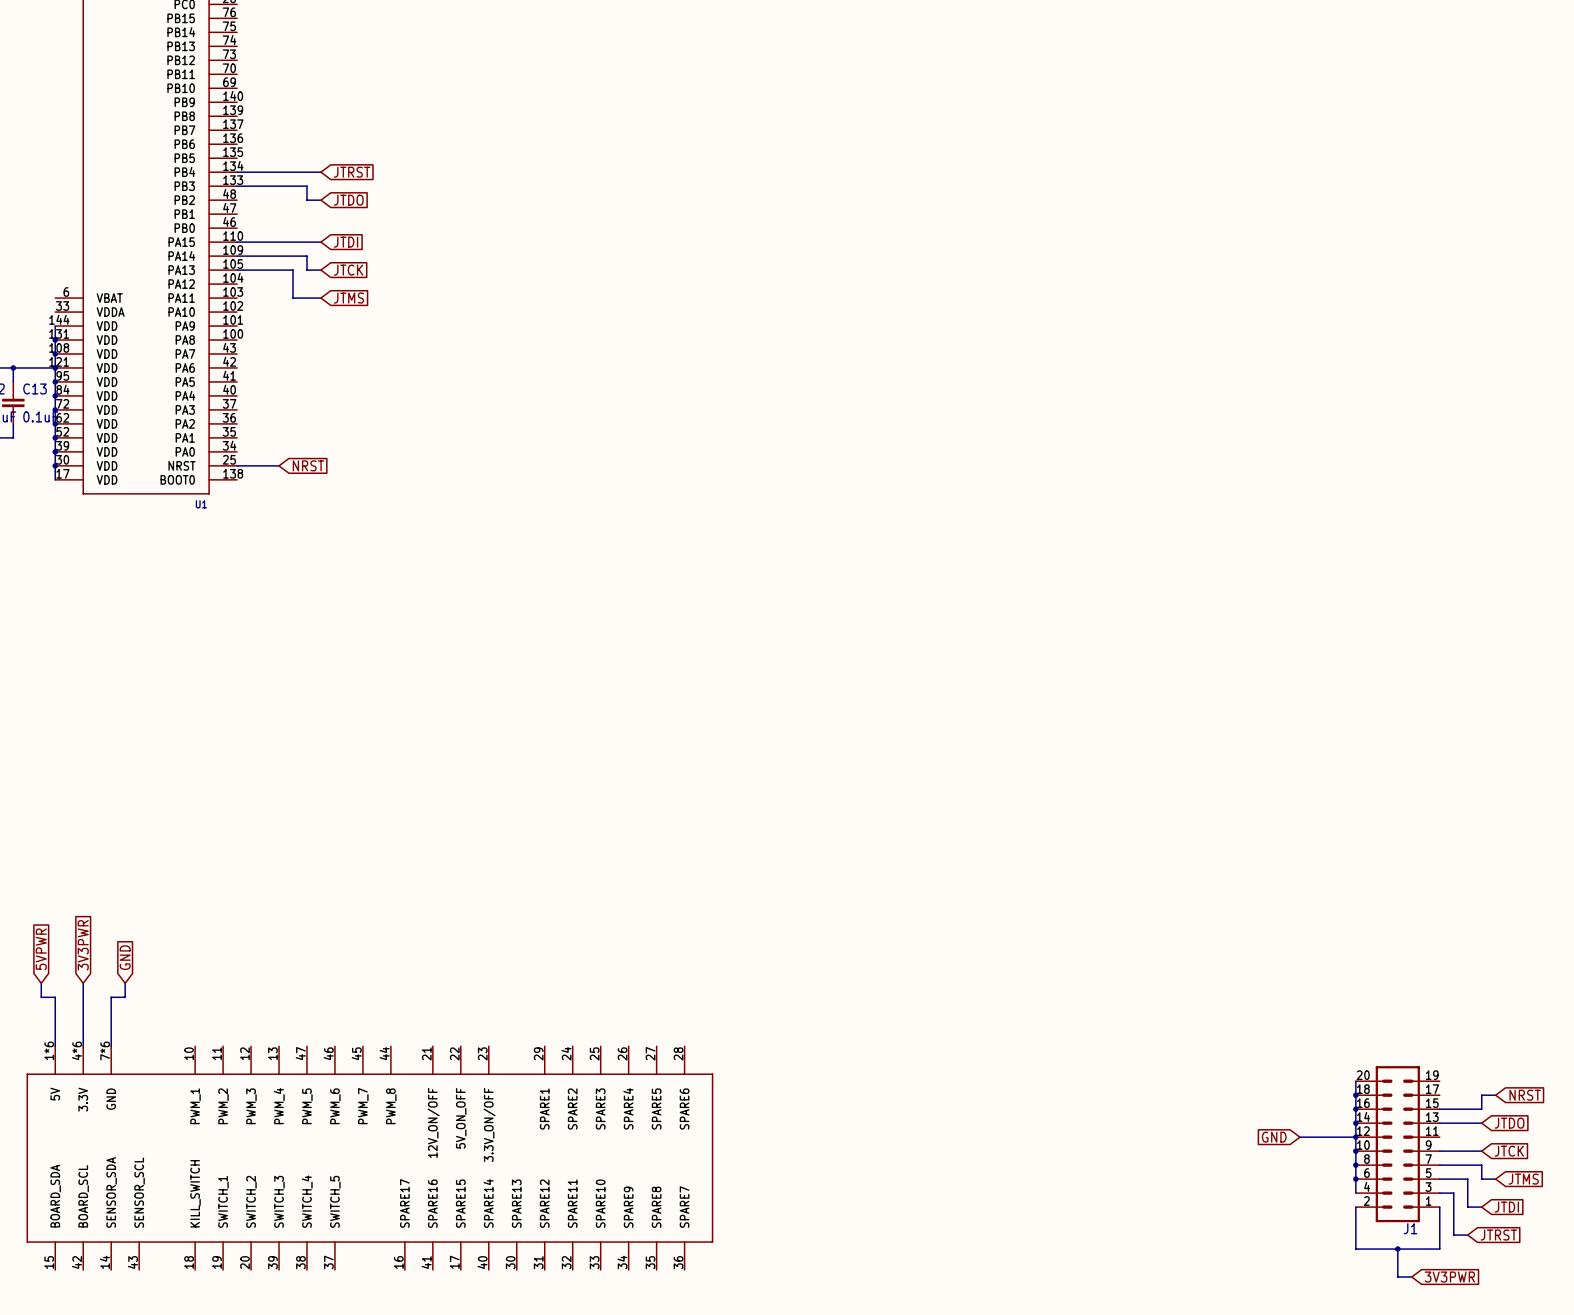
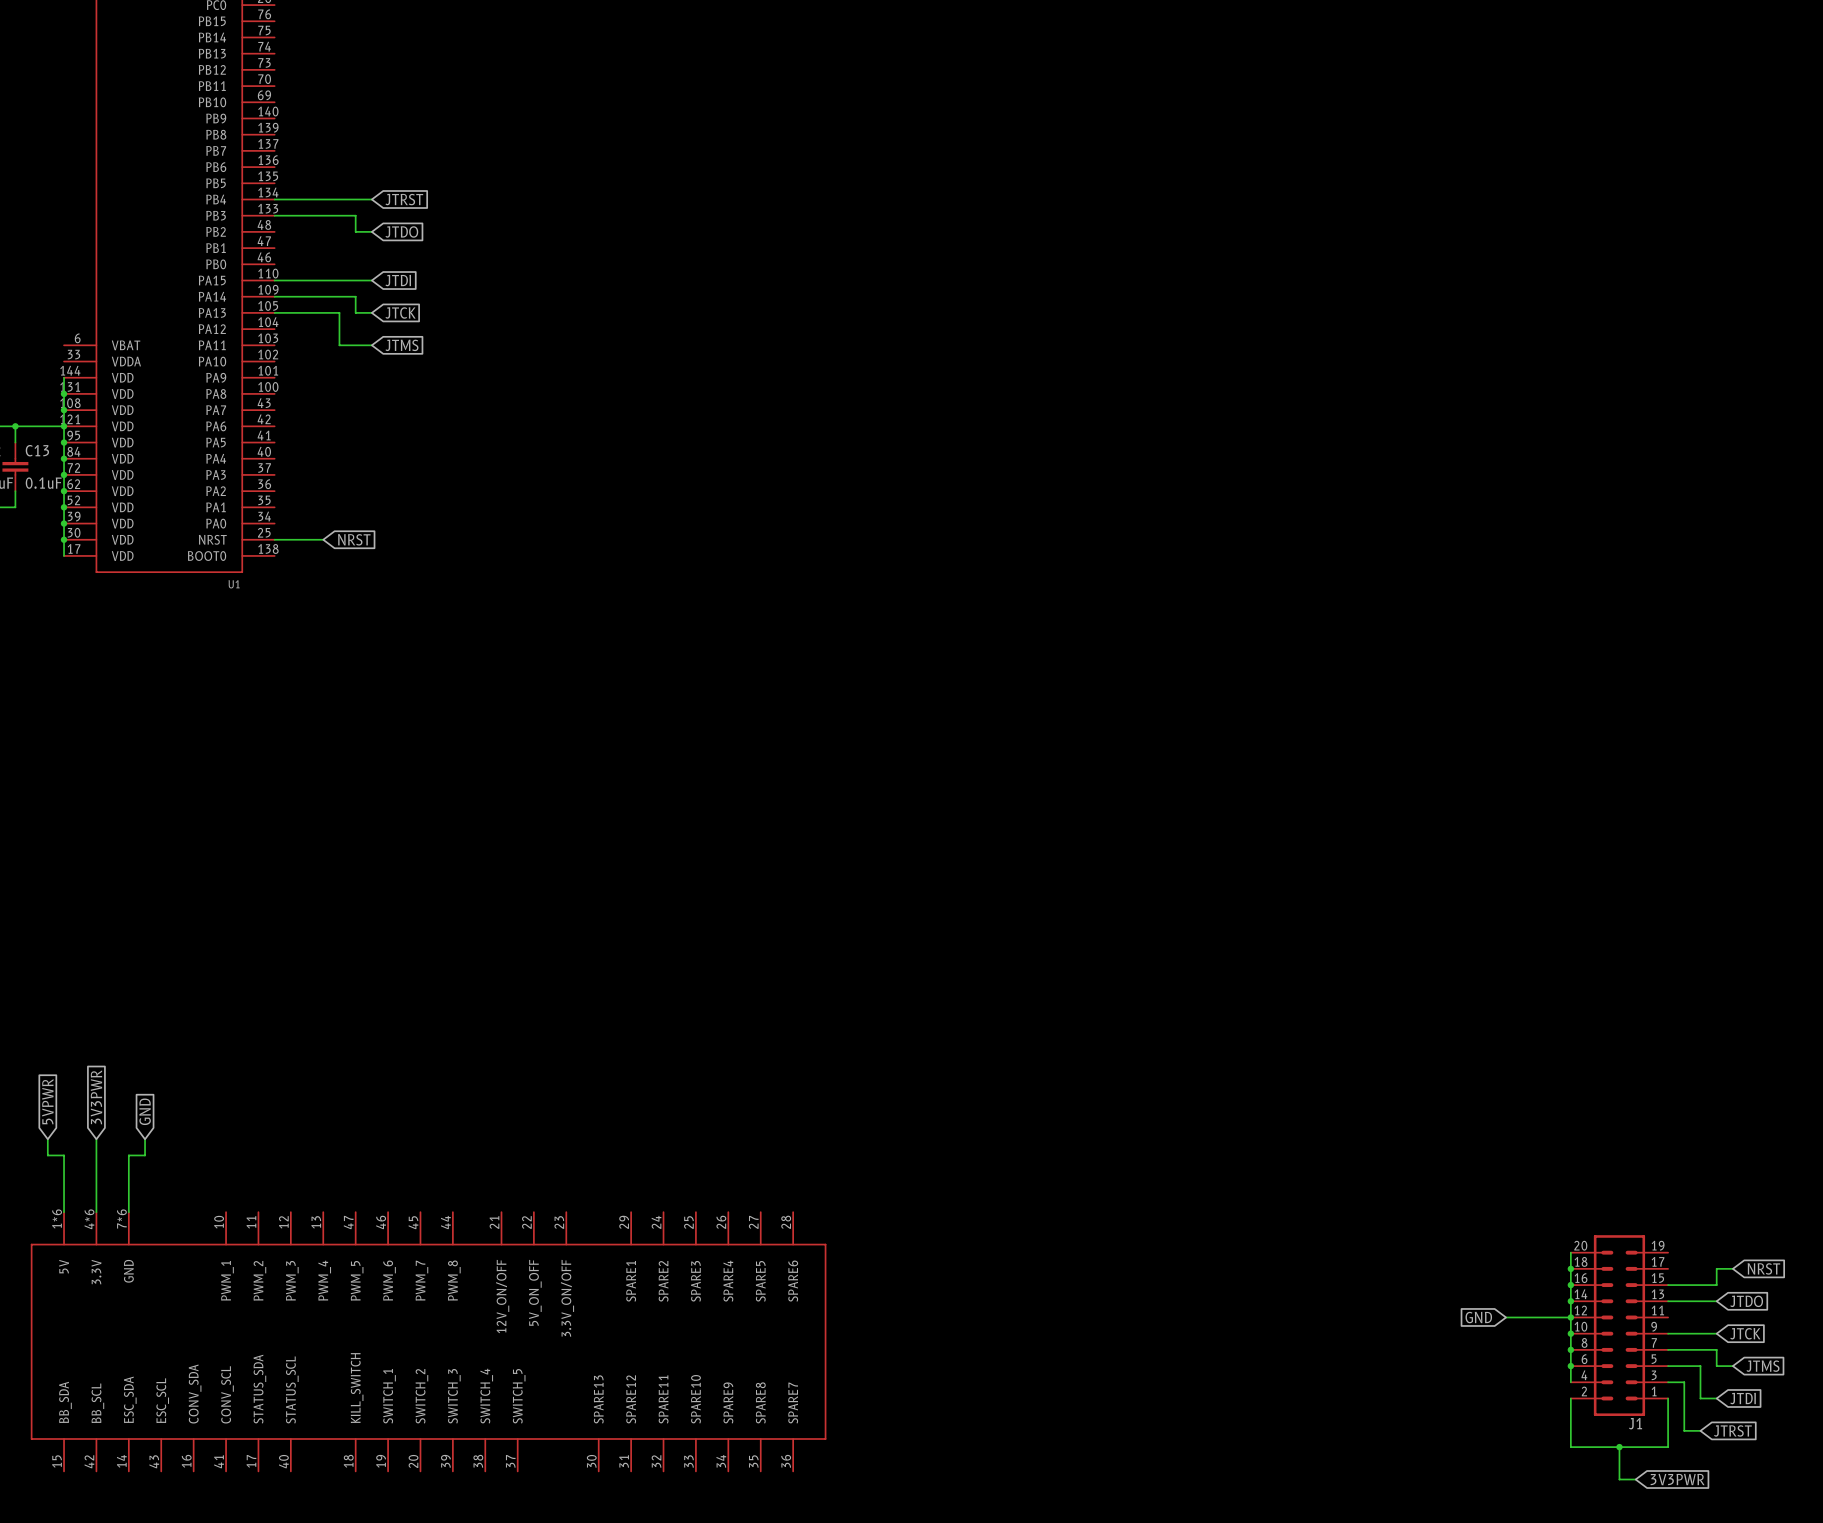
part symbol: [26, 1046, 714, 1271] -> [30, 1212, 827, 1472]

